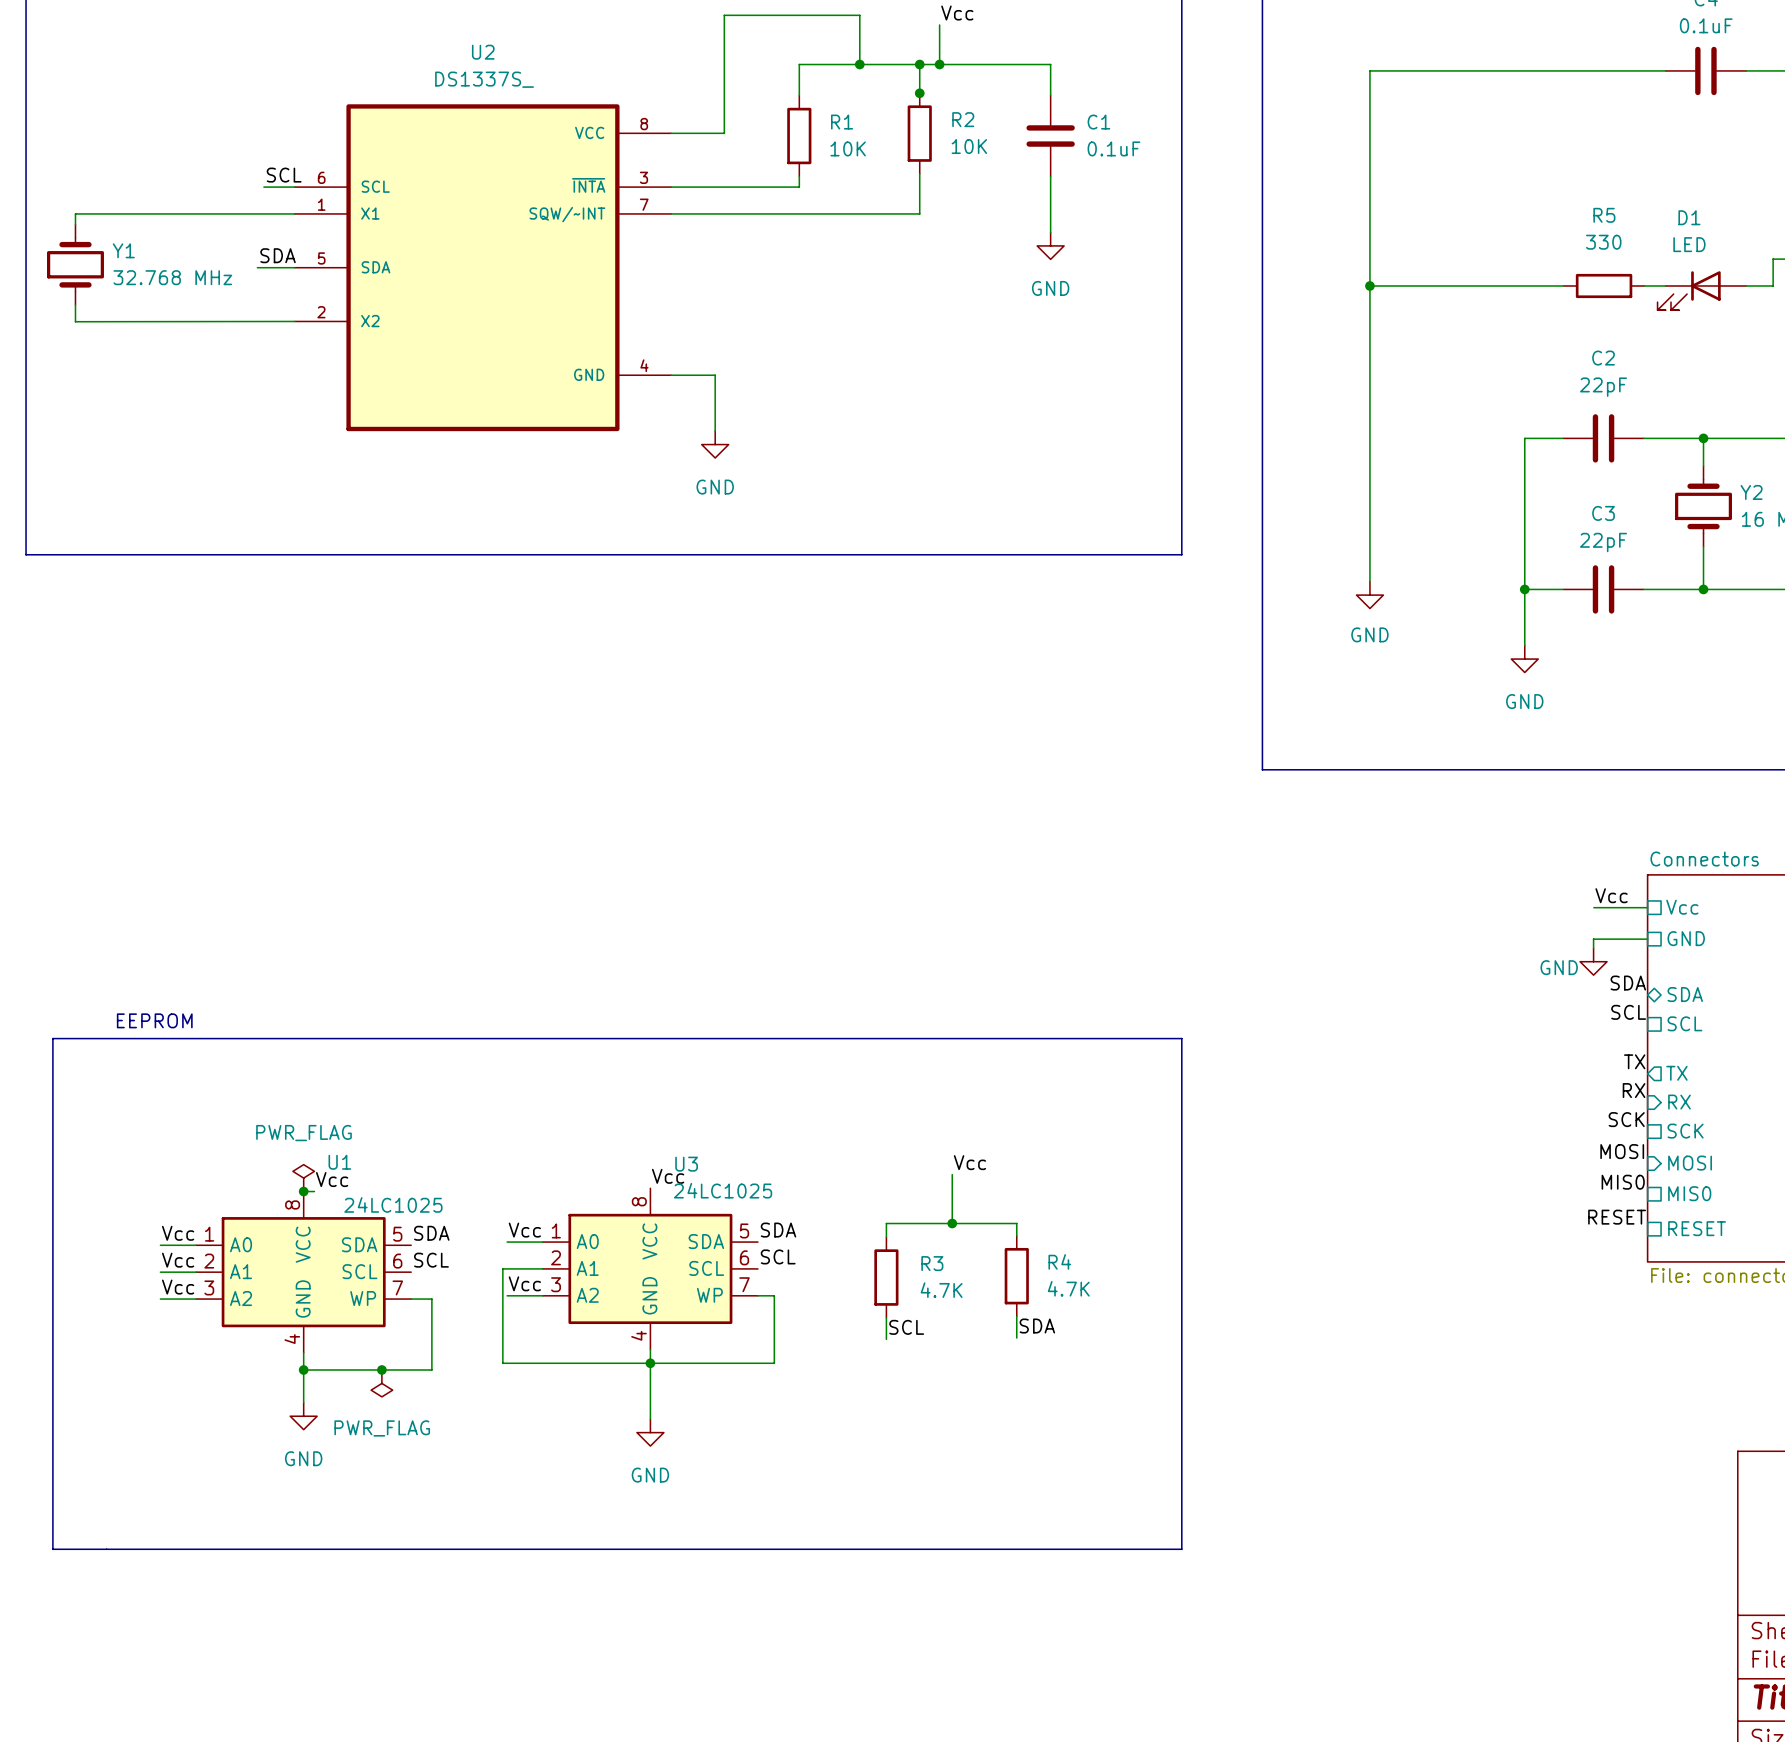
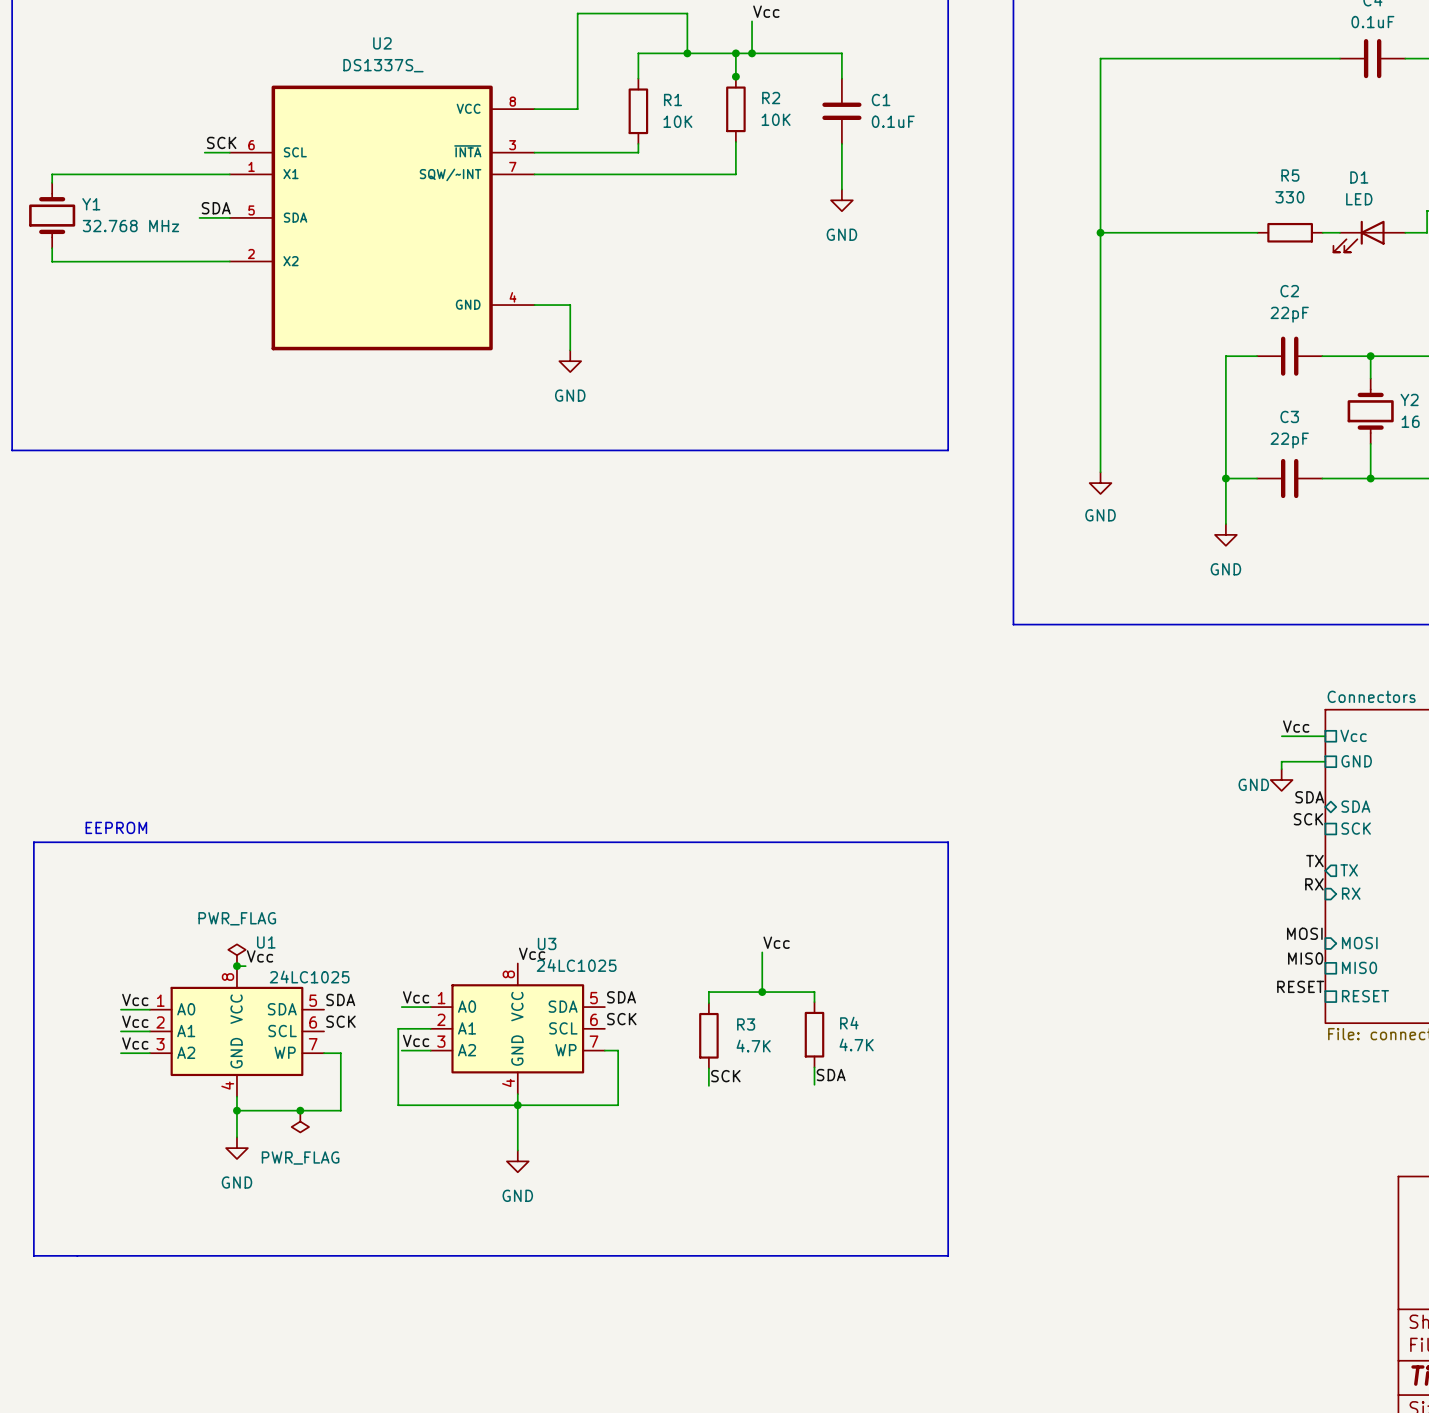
label: SCL (284, 175) -> SCK (221, 142)
label: SCL (1628, 1012) -> SCK (1308, 819)
sheet pin: SCL (1684, 1023) -> SCK (1356, 828)
label: SCK (1626, 1119) -> none
sheet pin: SCK (1685, 1131) -> none
label: SCL (778, 1256) -> SCK (621, 1019)
label: SCL (431, 1260) -> SCK (340, 1021)
label: SCL (906, 1327) -> SCK (725, 1076)

